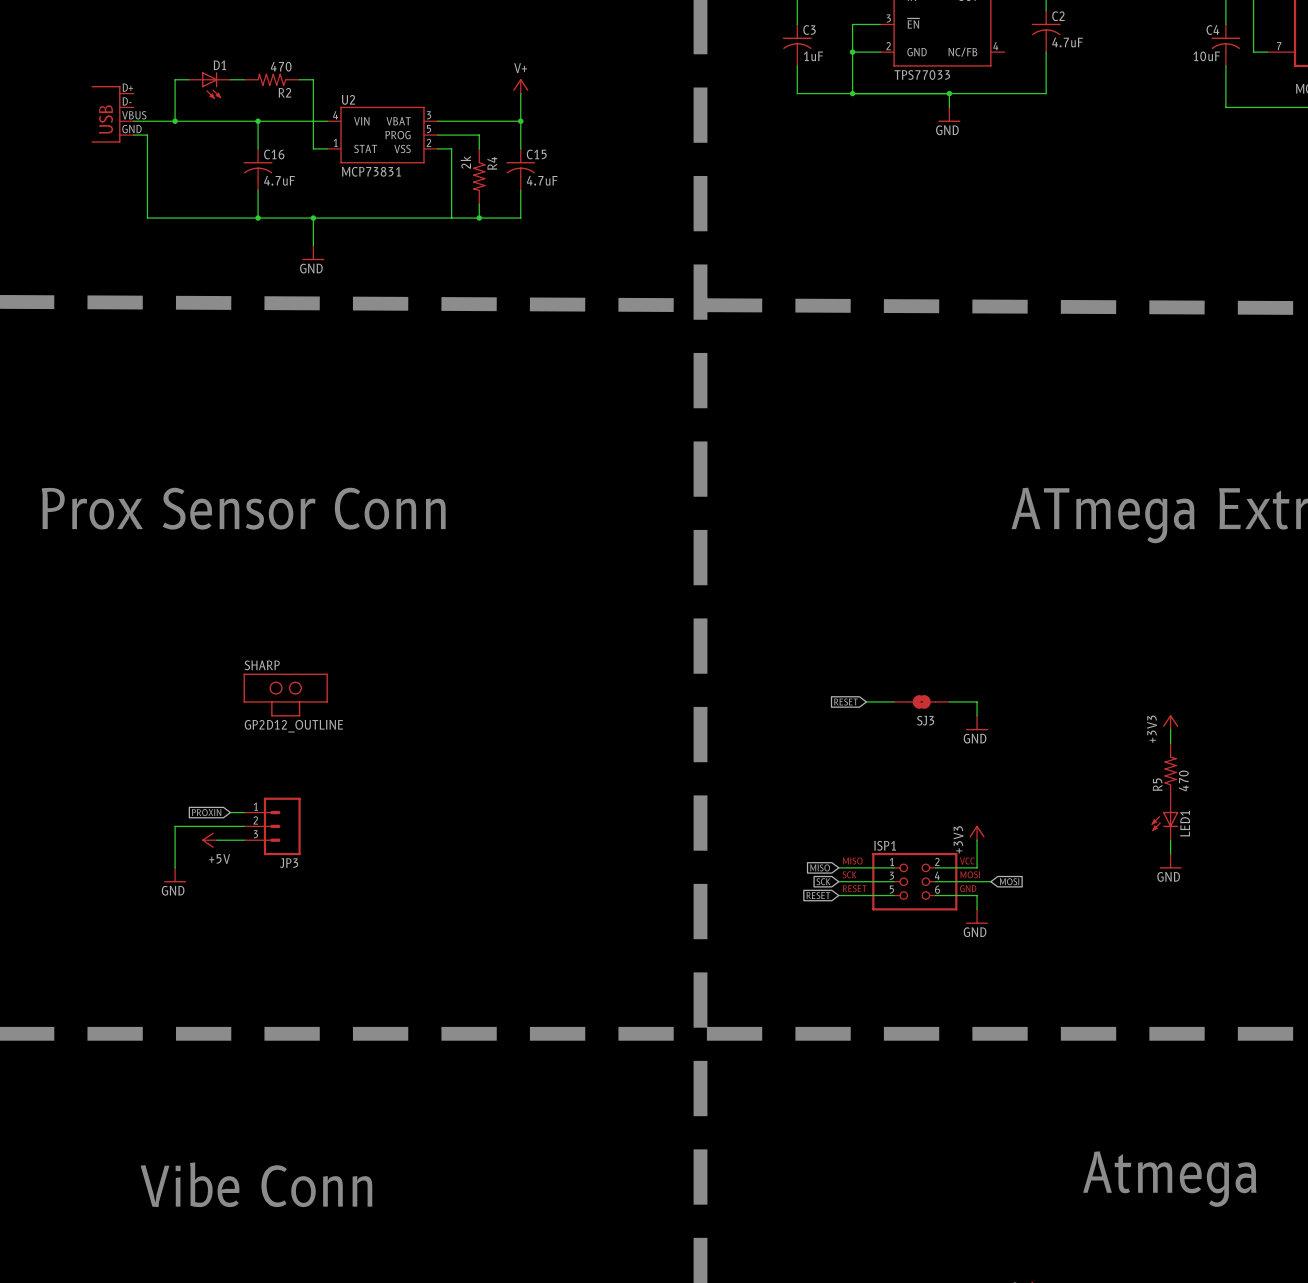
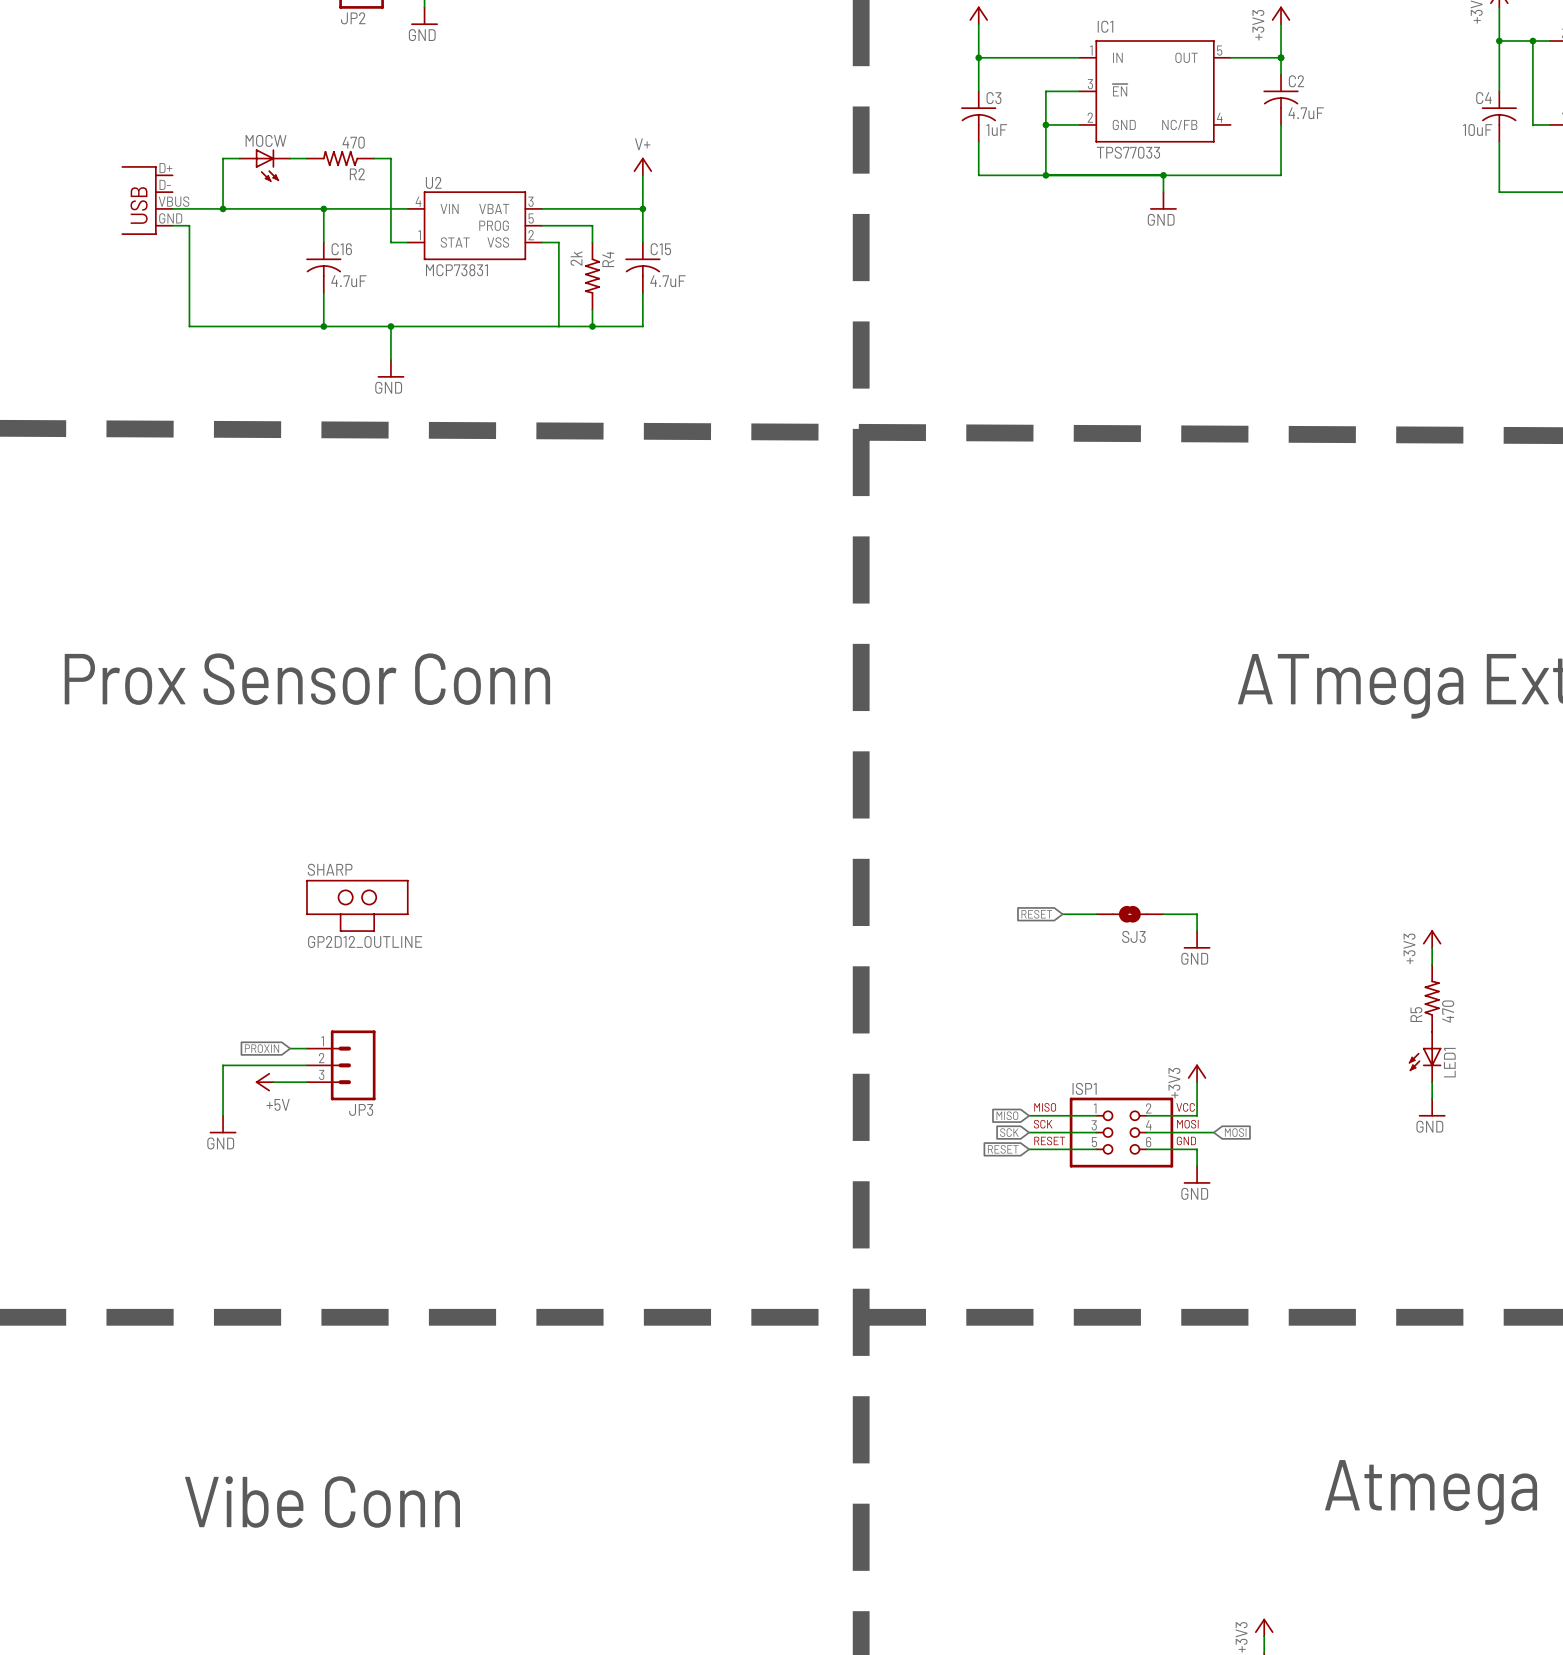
D1 name: D1 (219, 65) -> MOCW (266, 140)

